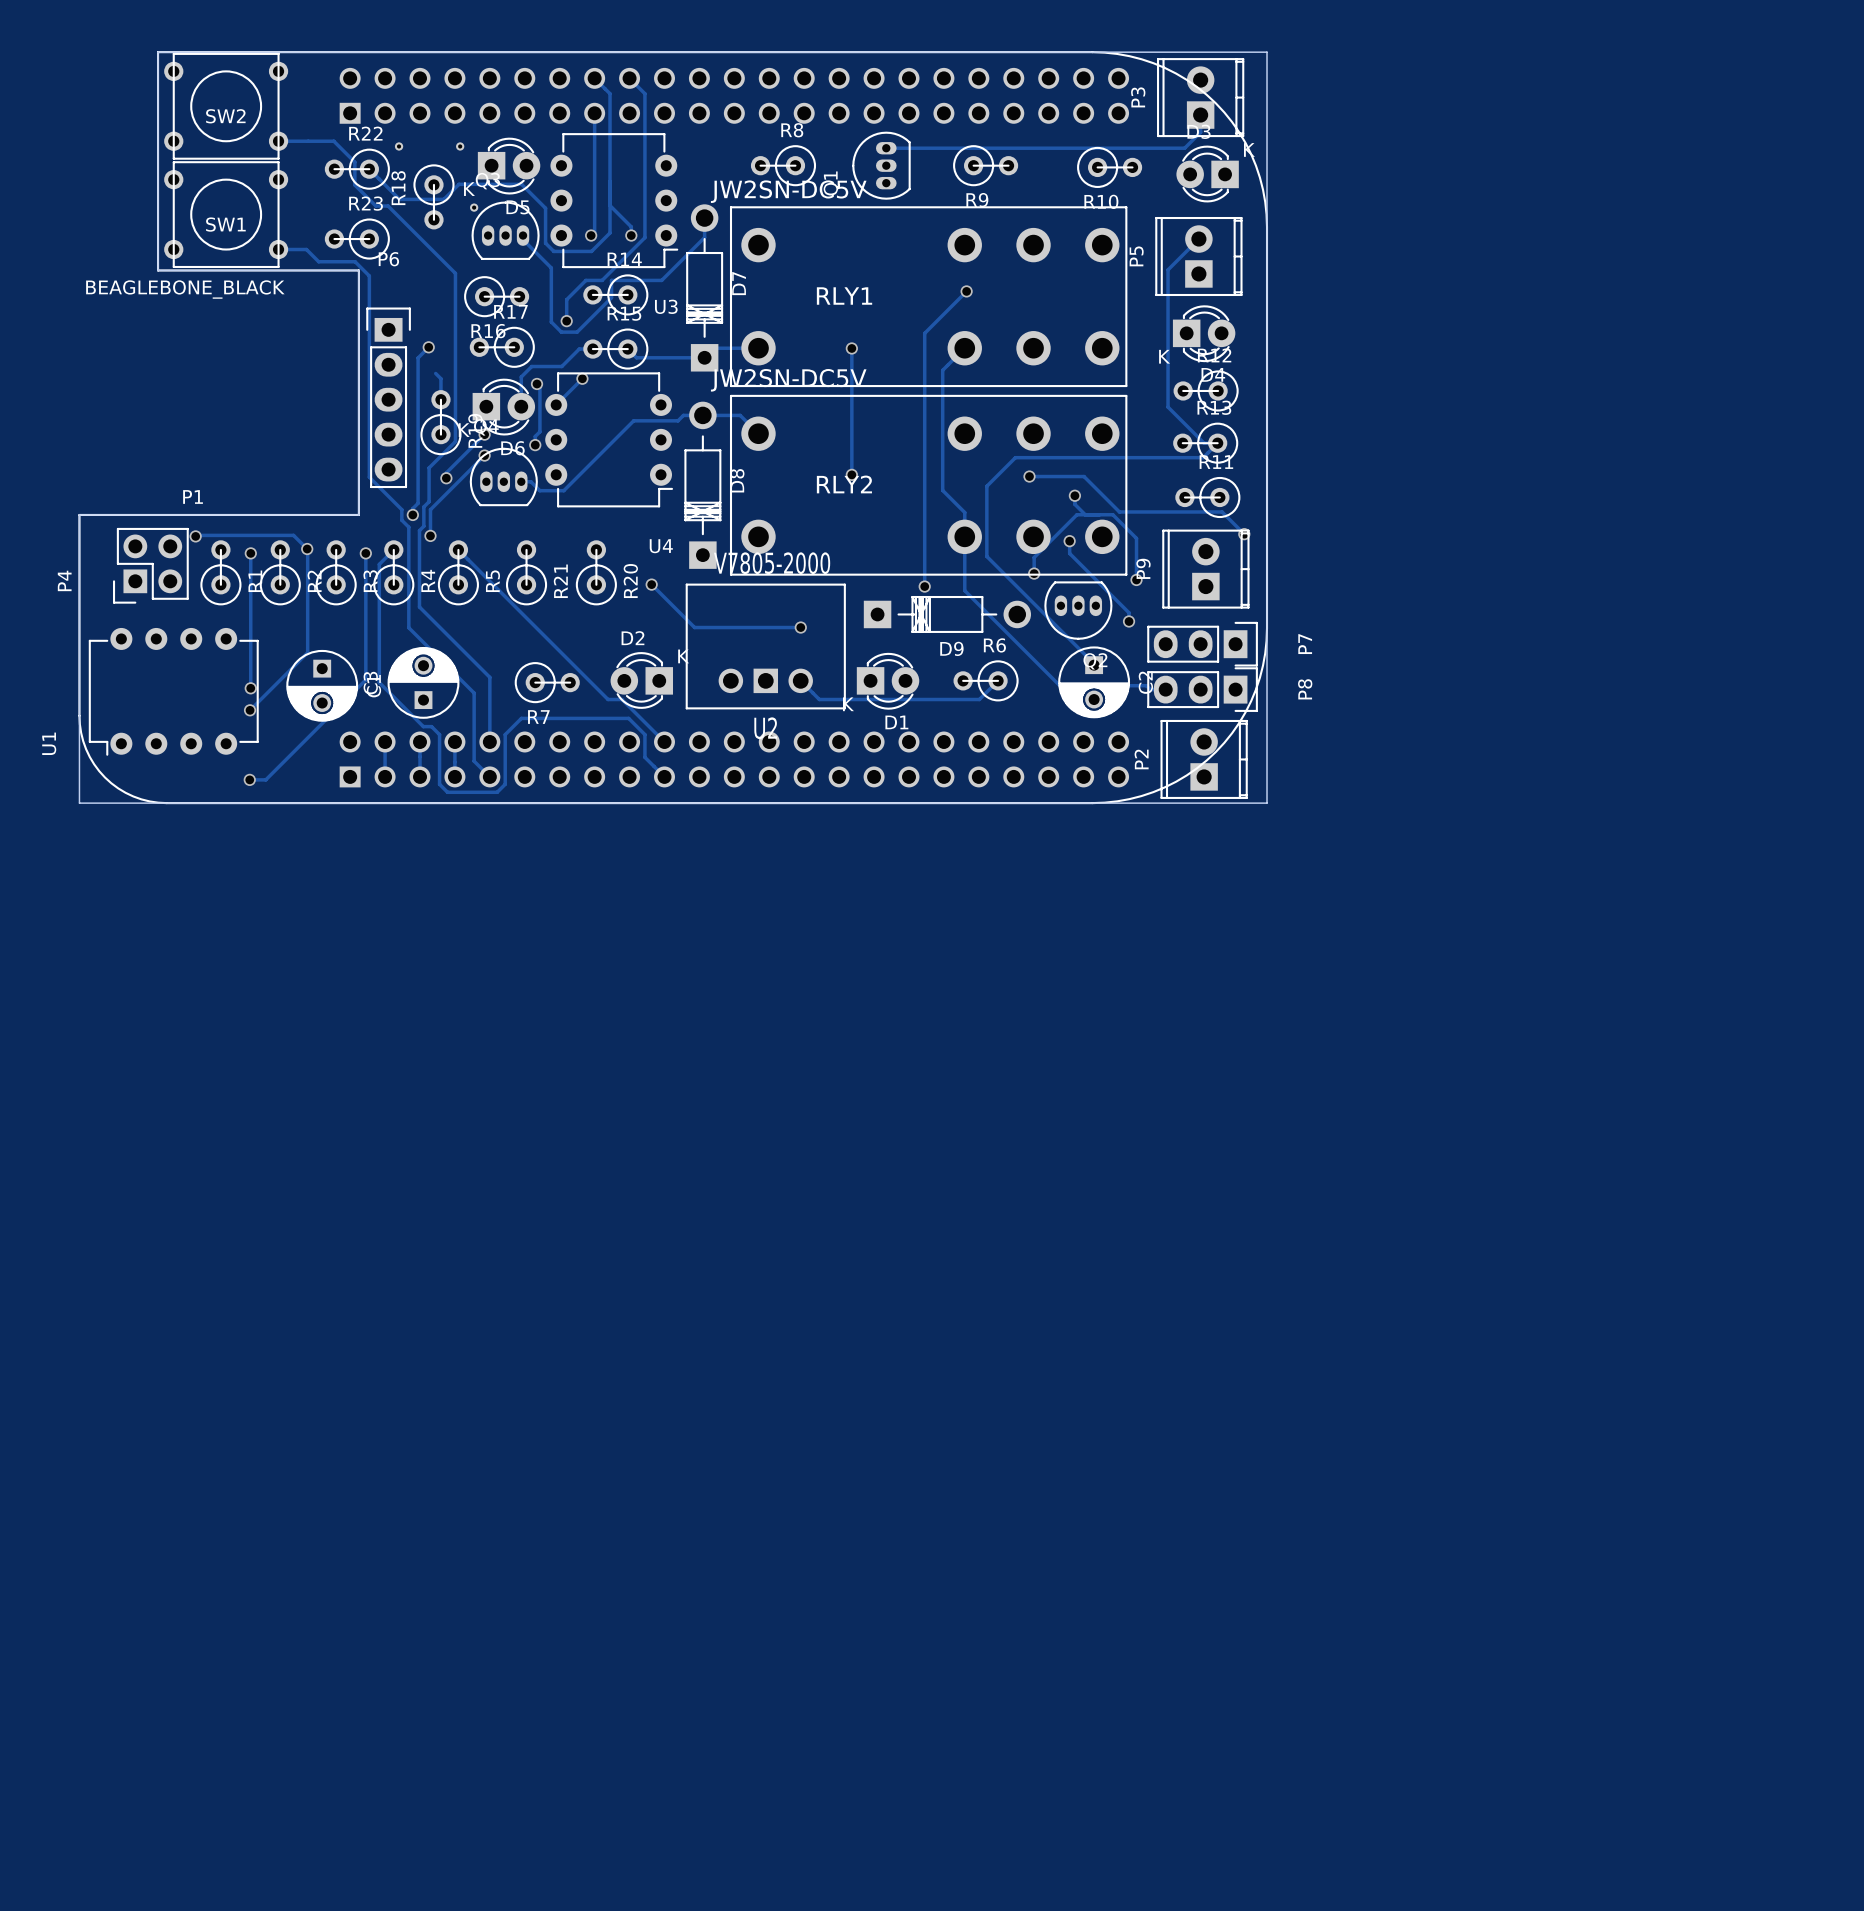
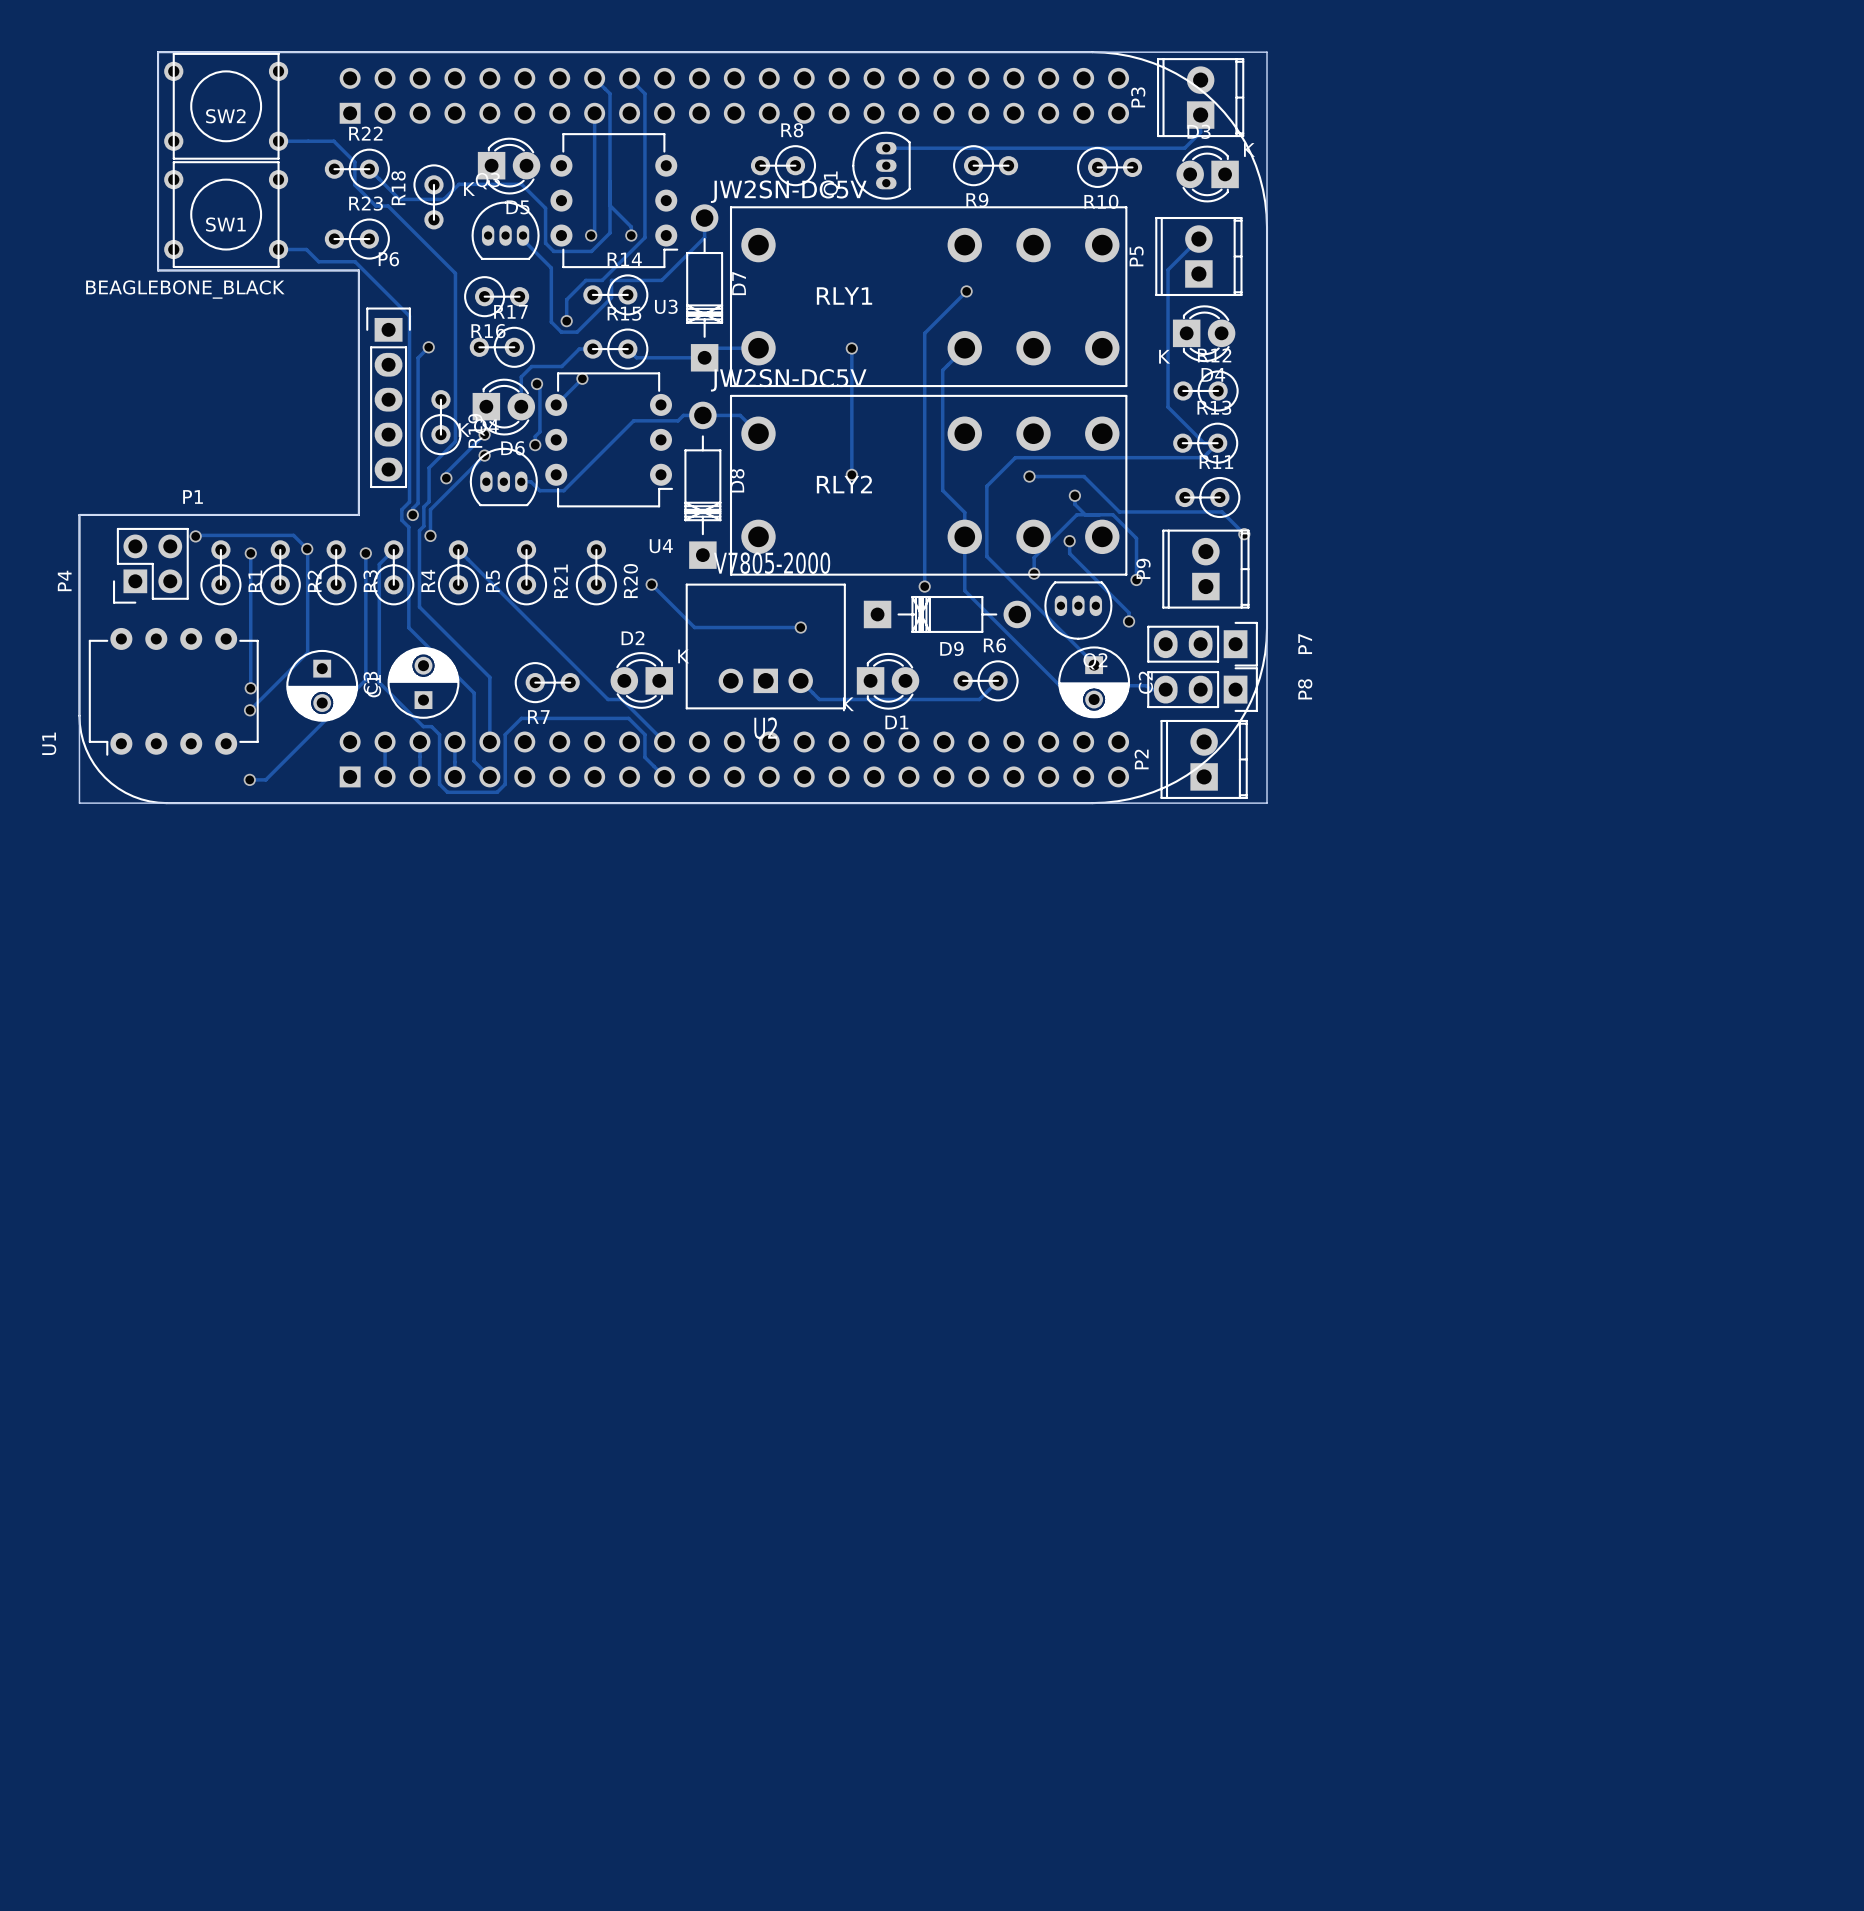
part: (399, 146) -> none
part: (460, 146) -> none
part: (474, 207) -> none
track: (369, 275) (369, 477) (401, 509) -> (369, 275) (409, 316) (409, 502) (401, 509)
track: (435, 373) (440, 378) (440, 399) -> none

